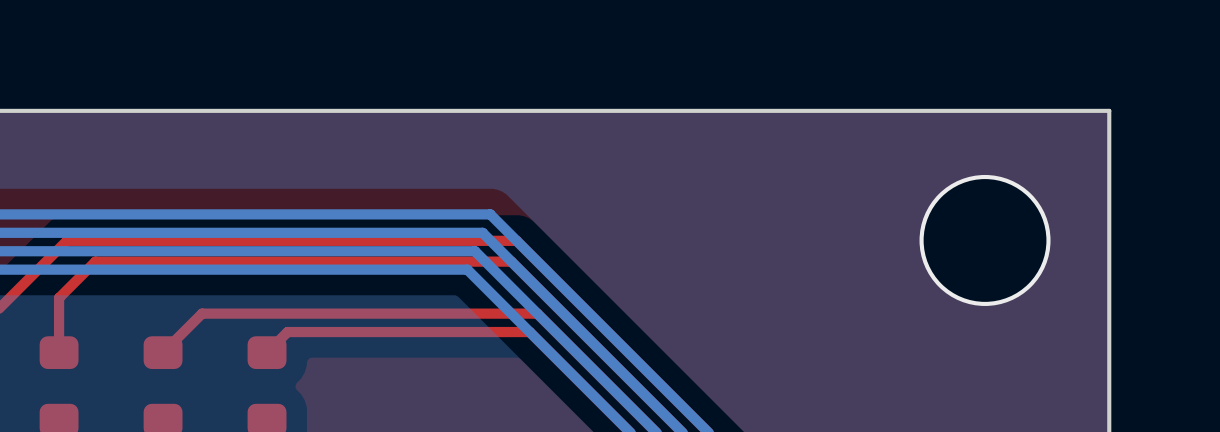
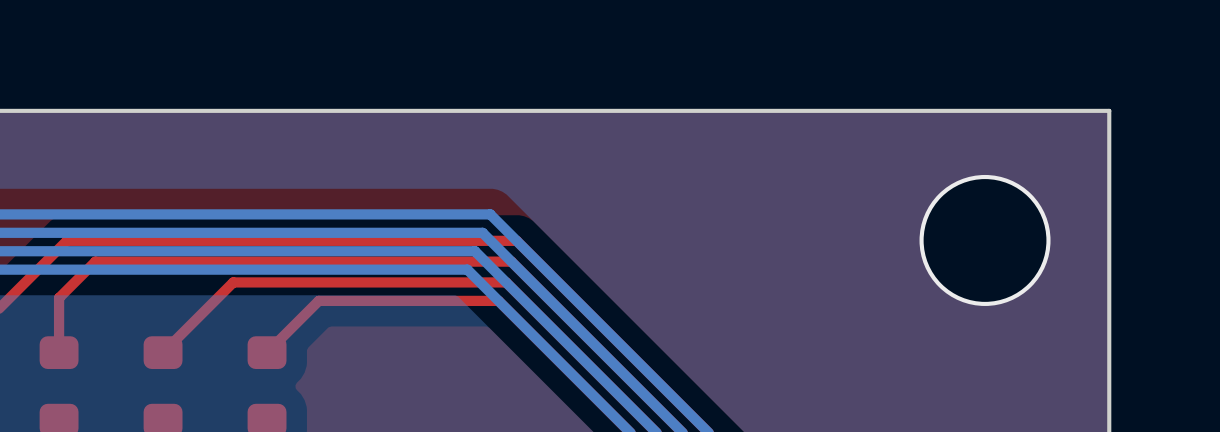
top track: (537, 313) (202, 313) -> (537, 313) (506, 282) (233, 282) (202, 313)
top track: (529, 332) (287, 332) -> (529, 332) (498, 300) (318, 300) (287, 332)

